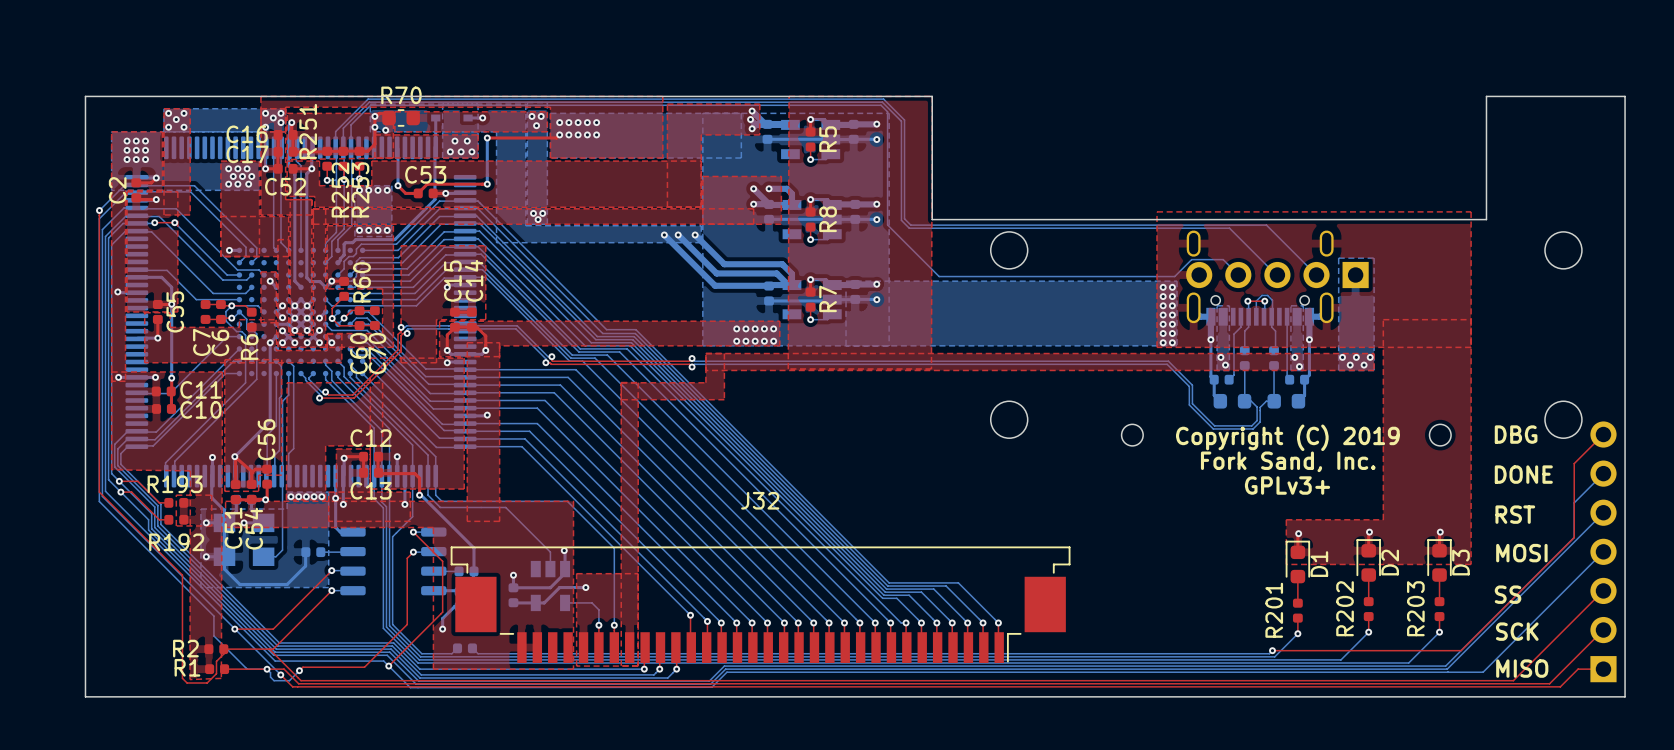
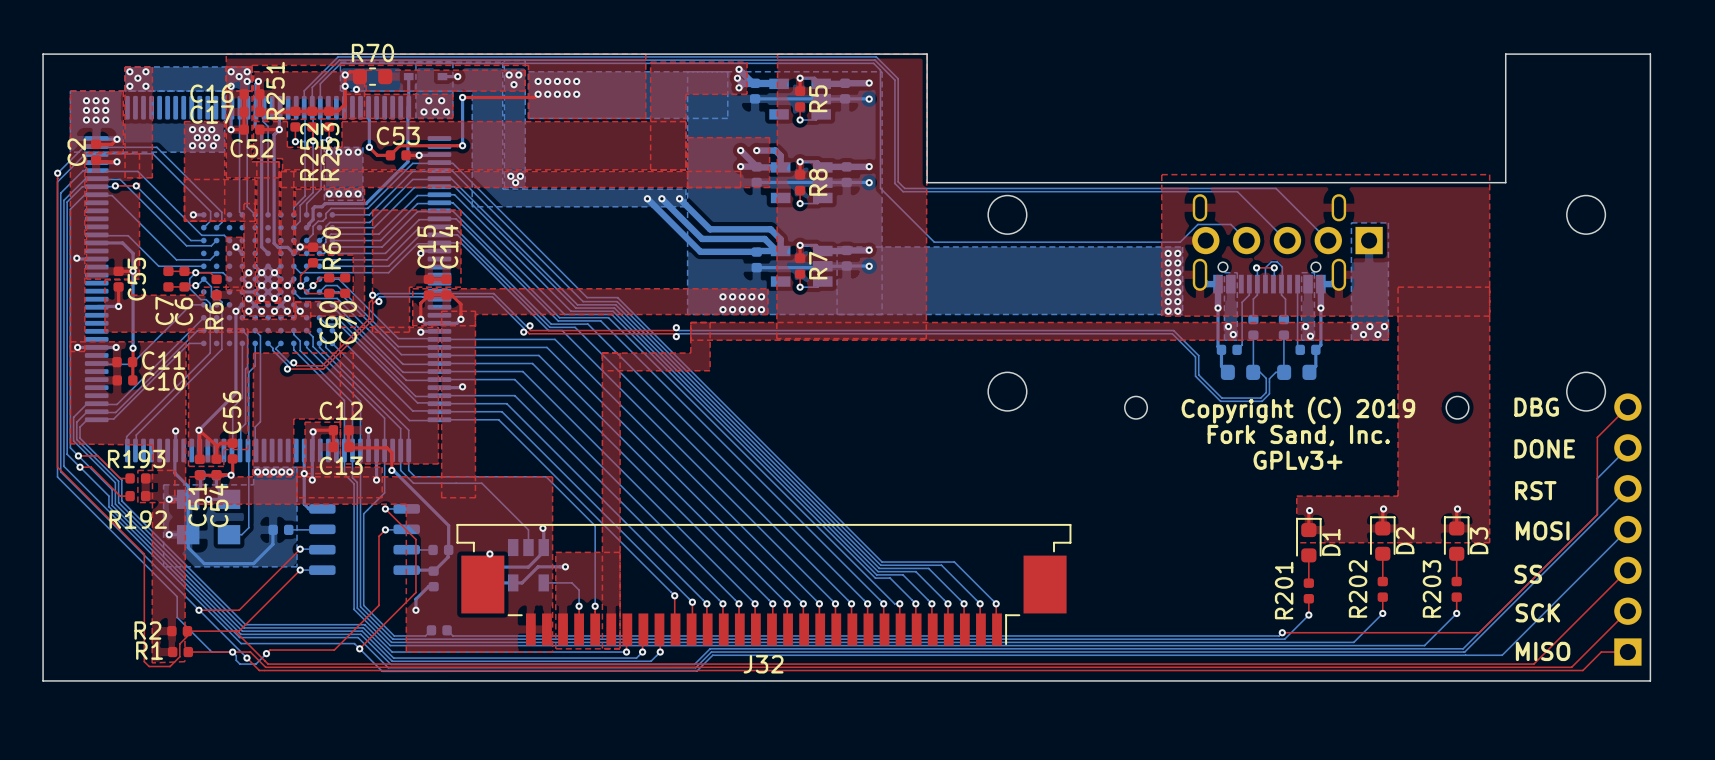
J32 name position: J32 (760, 500) -> J32 (763, 664)
J32 footprint: [450, 546, 1071, 663] -> [456, 523, 1072, 646]

